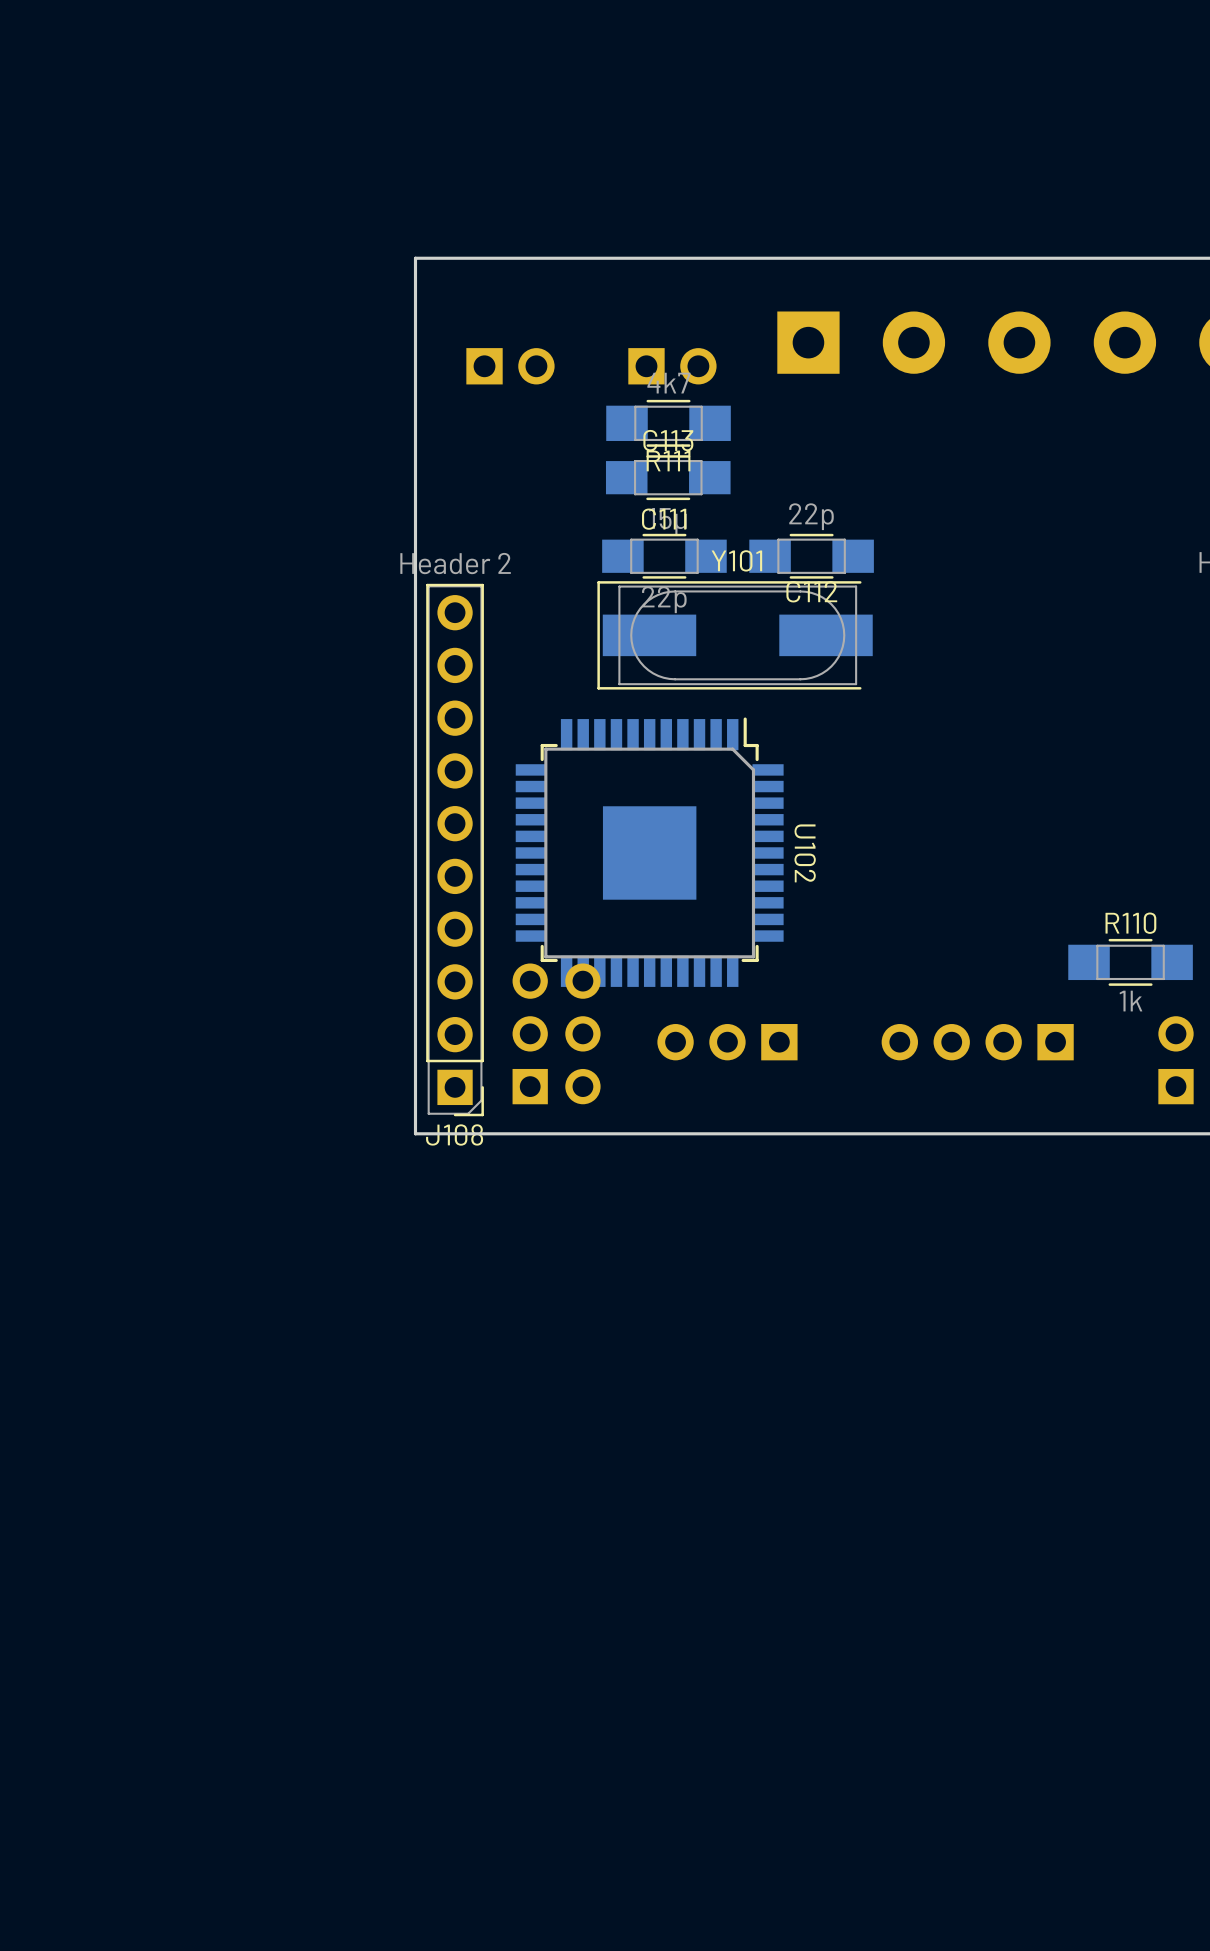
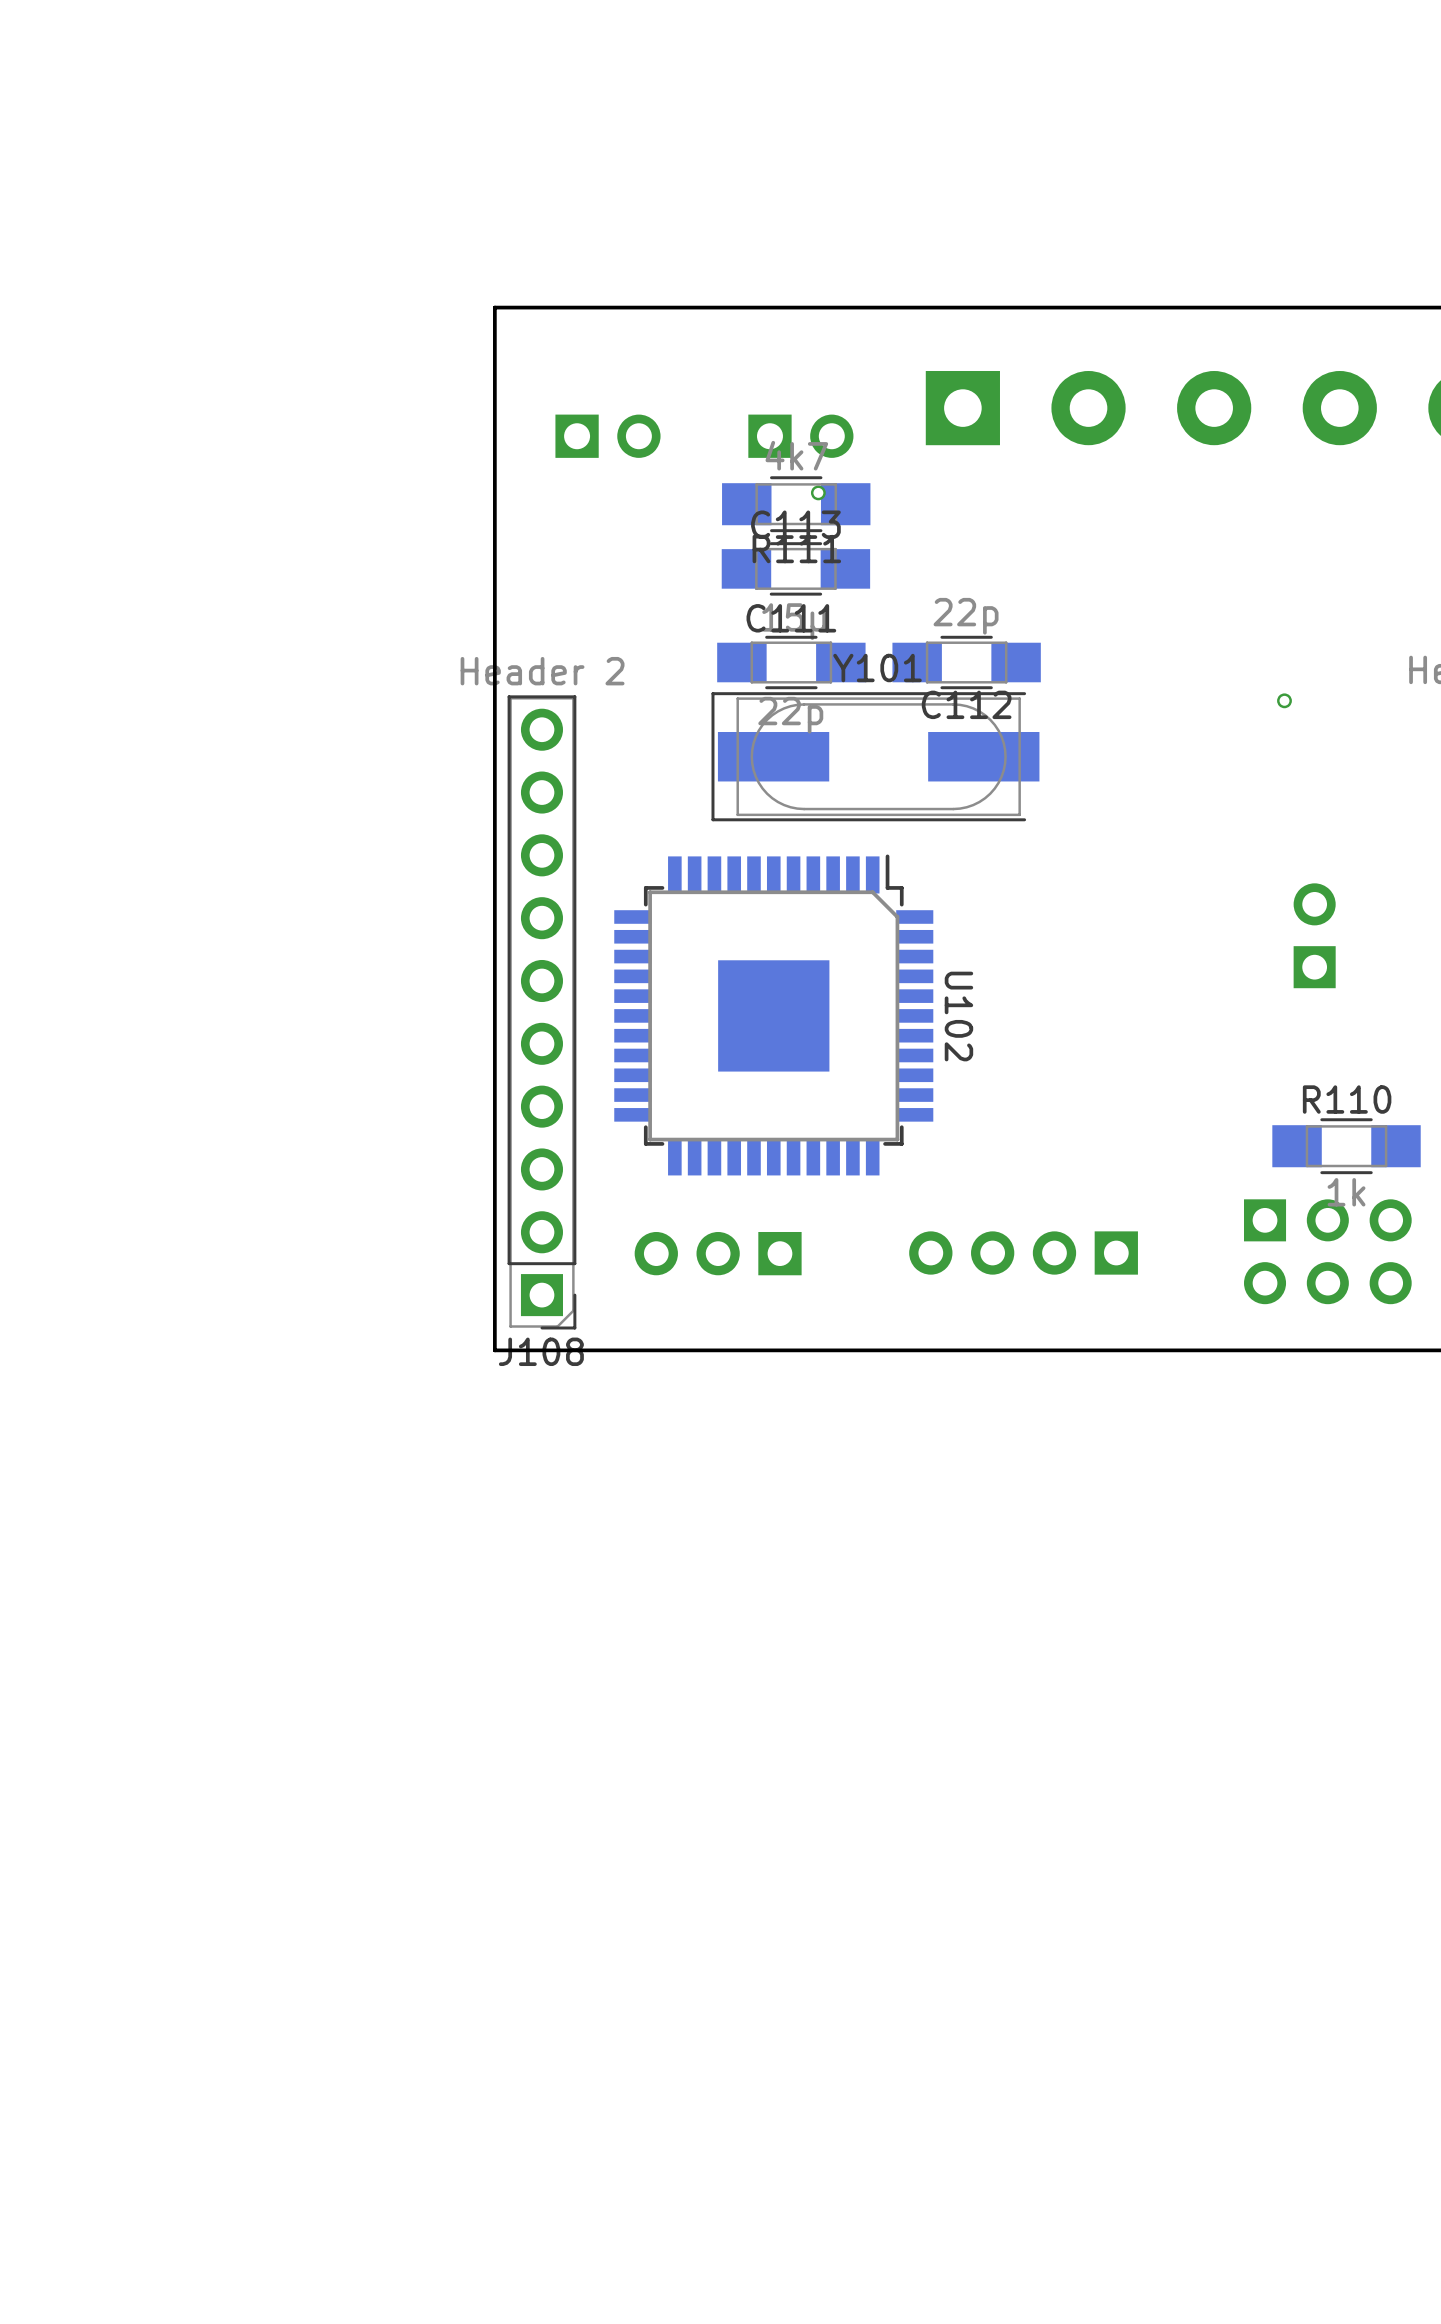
via: none -> (818, 492)
via: none -> (1284, 700)
part: (556, 1033) -> none
part position: (727, 1042) -> (718, 1253)
part position: (977, 1042) -> (1023, 1253)
part: none -> (1327, 1251)
part position: (1176, 1060) -> (1314, 935)

